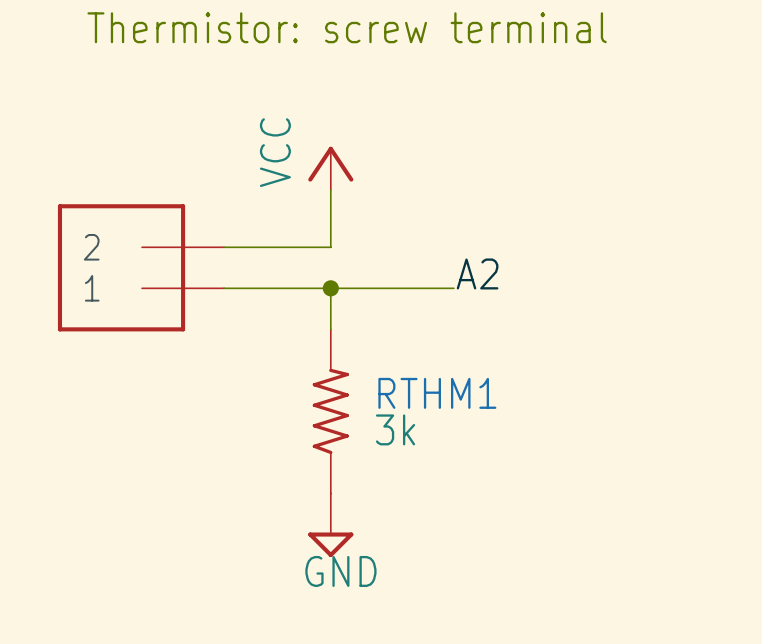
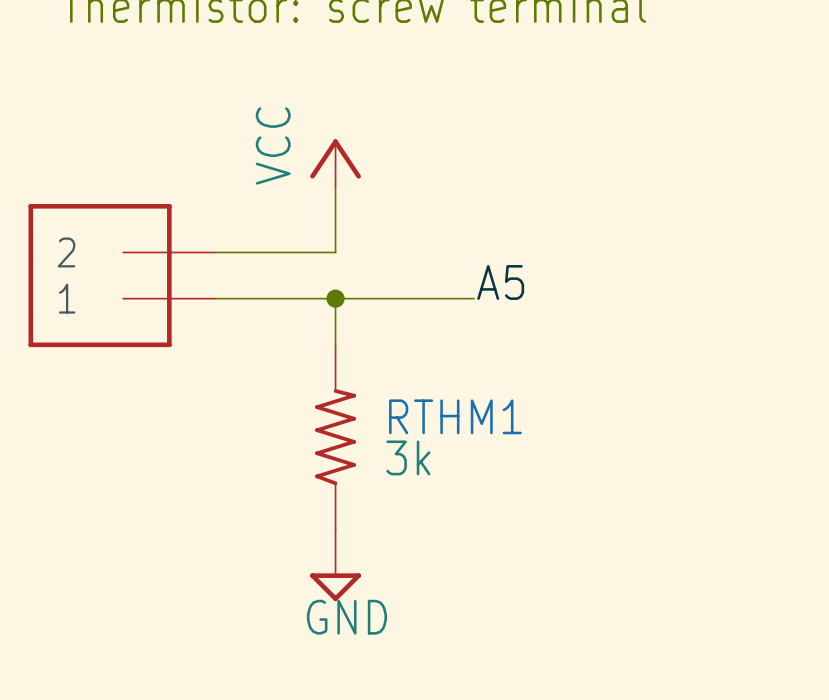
label: A2 (477, 273) -> A5 (500, 282)

